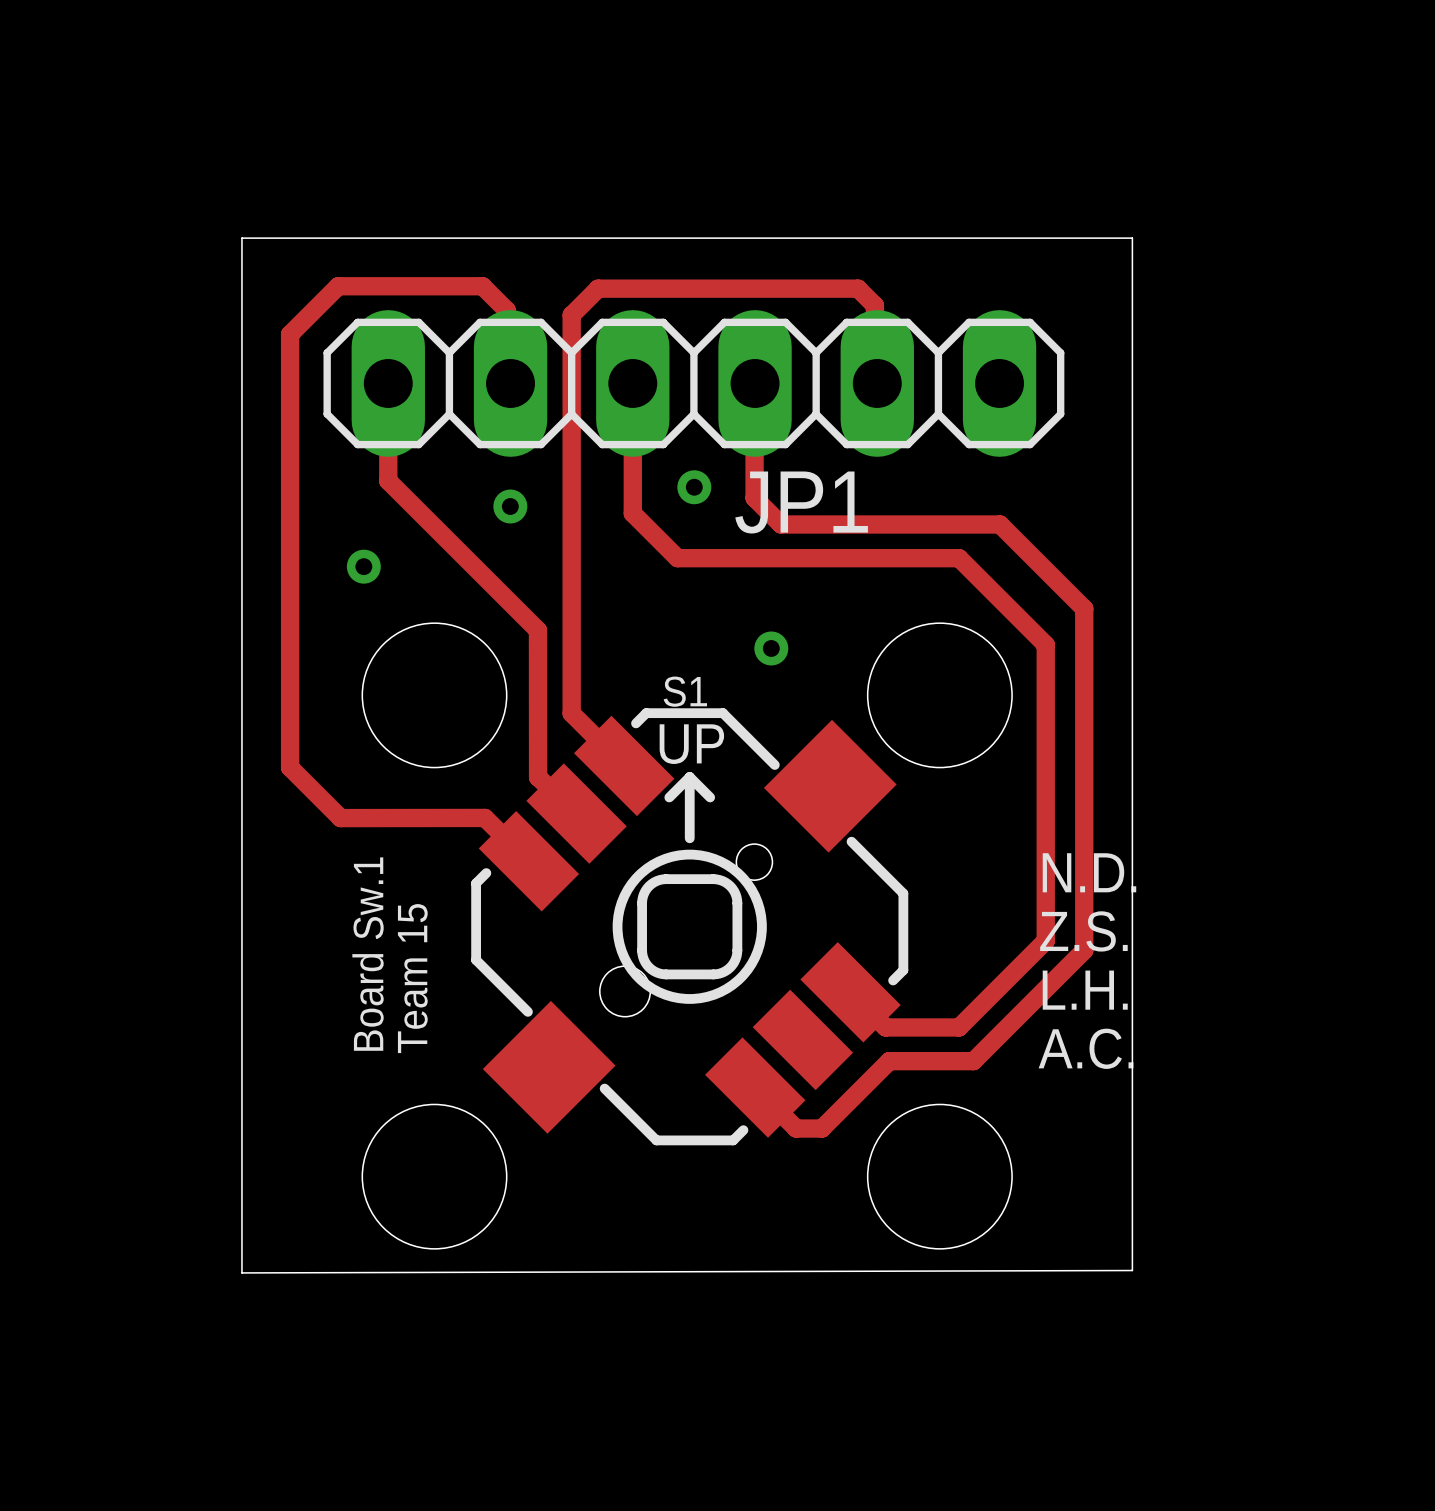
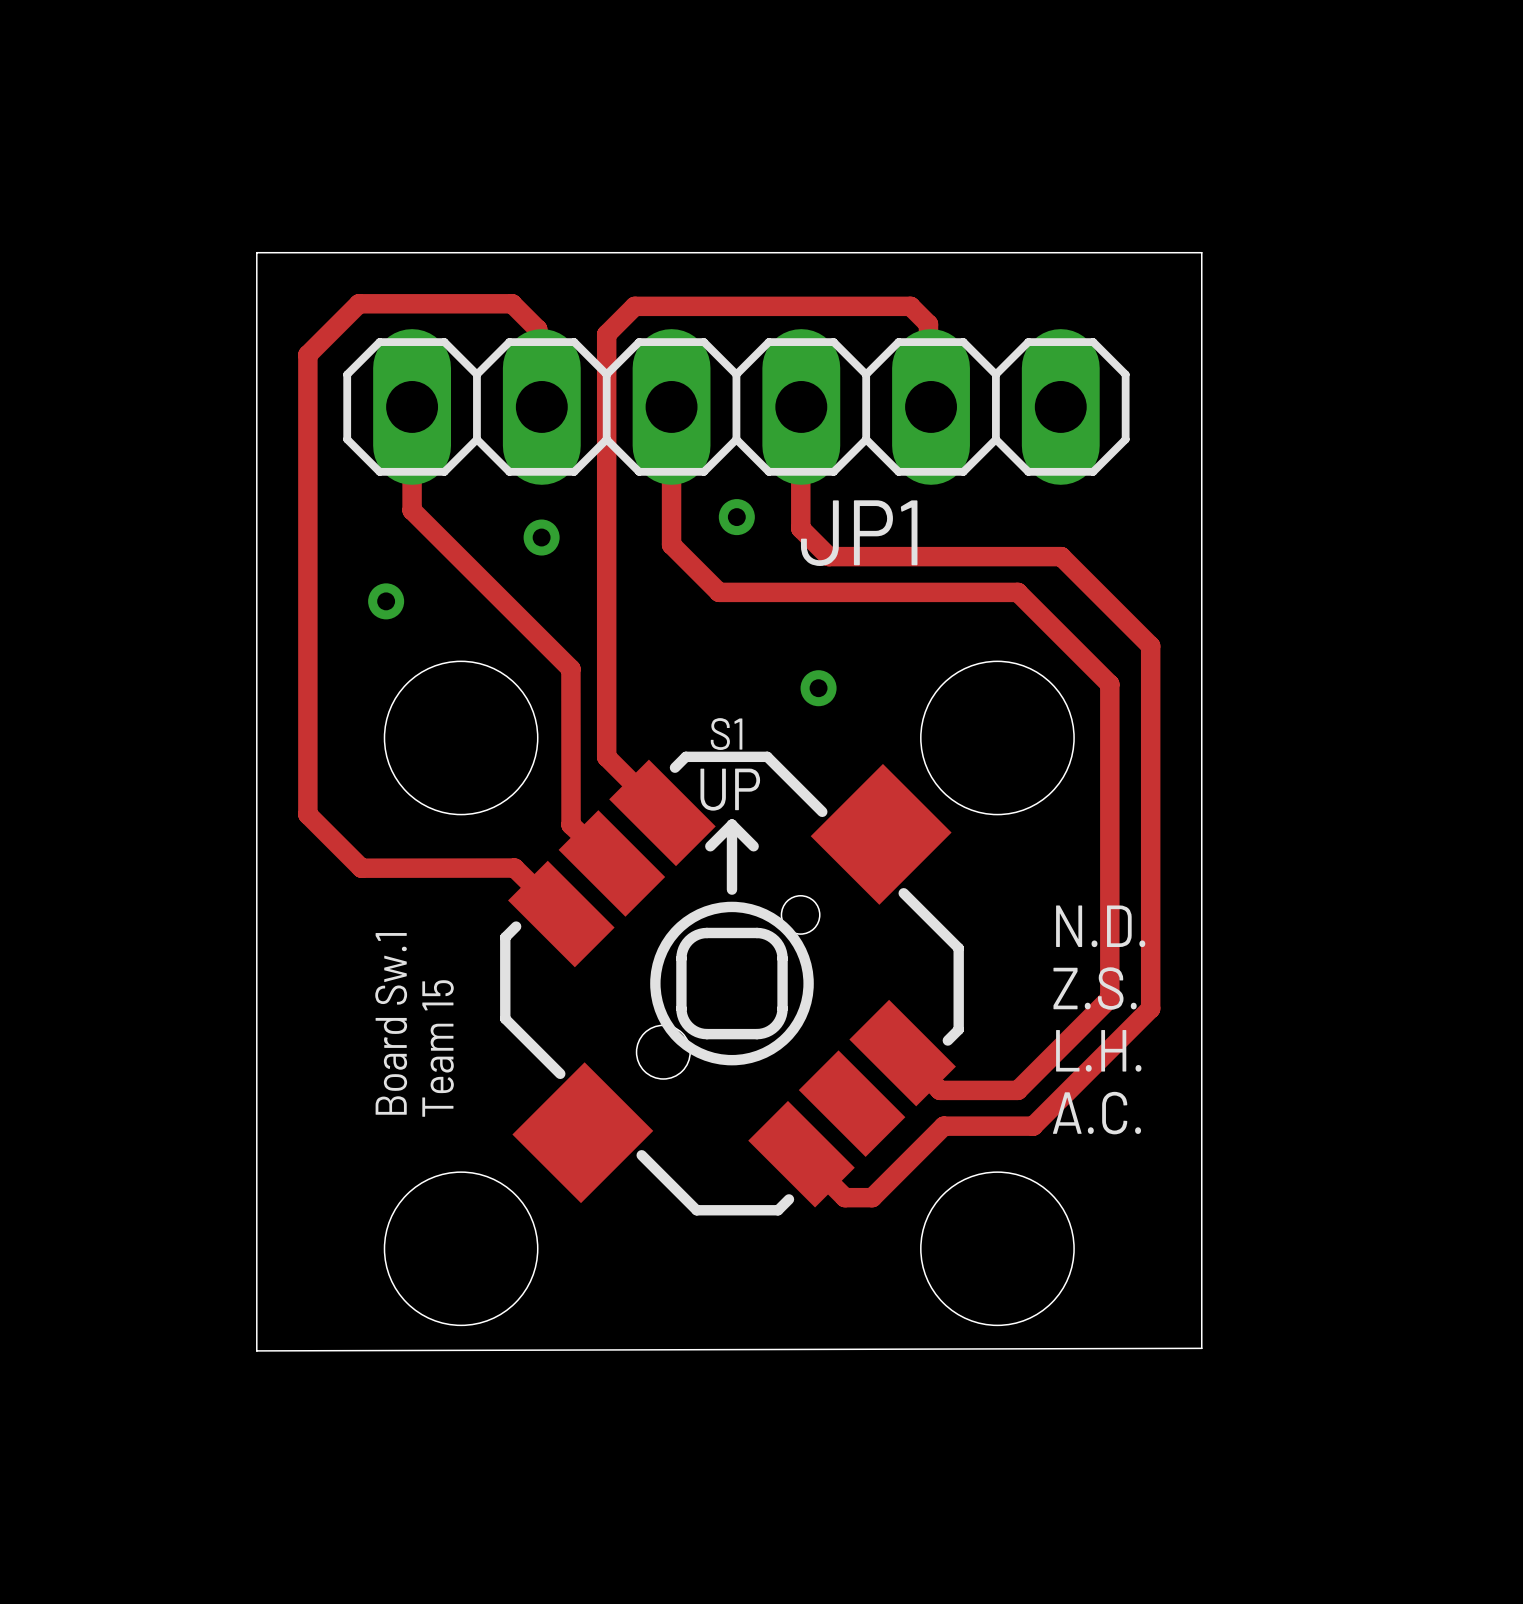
text position: N.D. (1089, 872) -> N.D. (1100, 926)
text position: Z.S. (1083, 931) -> Z.S. (1095, 988)
text position: L.H. (1085, 990) -> L.H. (1098, 1050)
text position: A.C. (1086, 1048) -> A.C. (1096, 1113)

